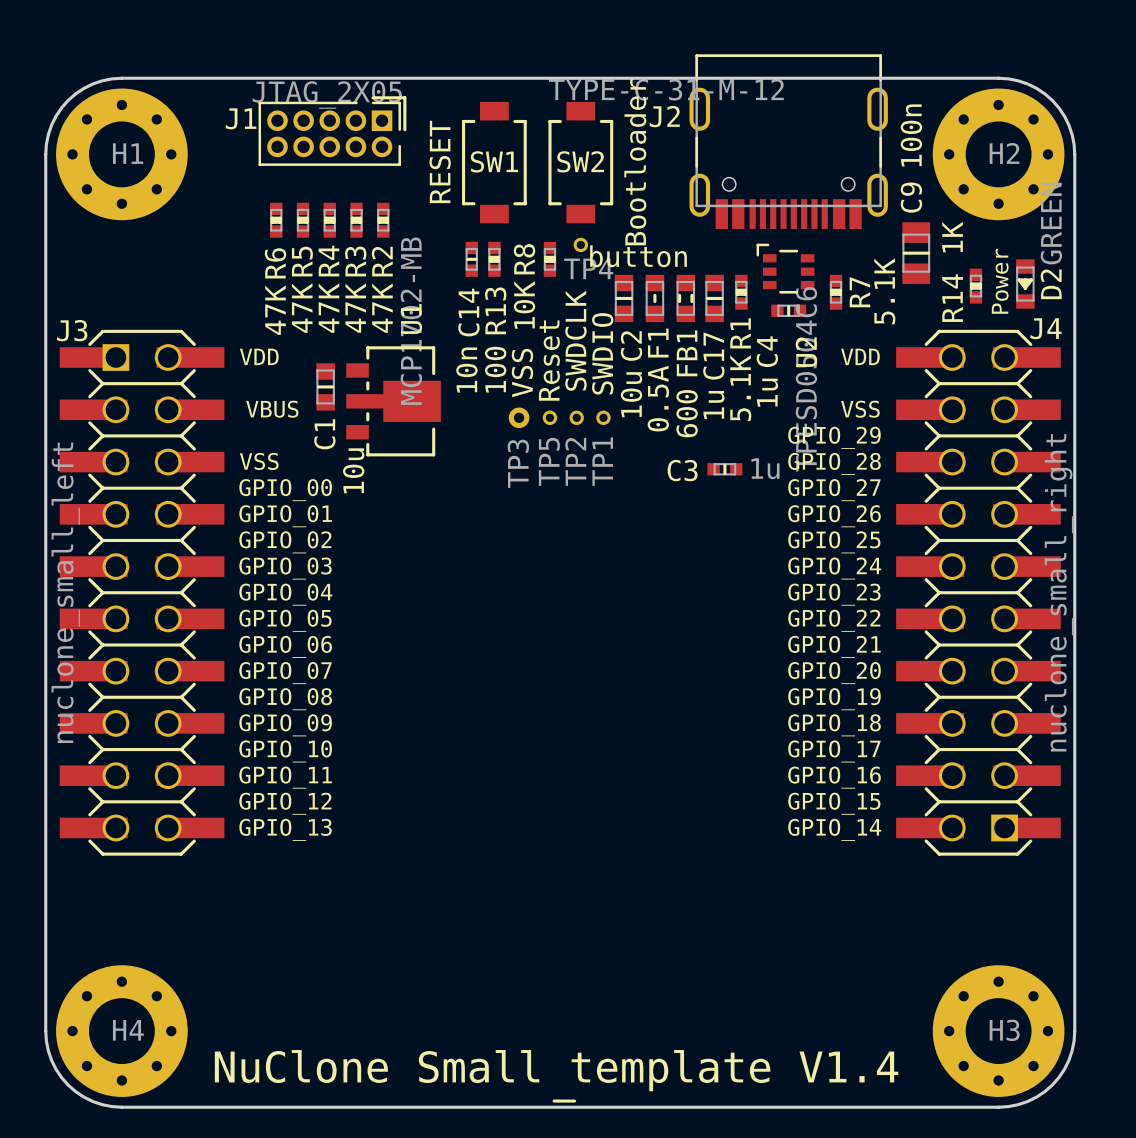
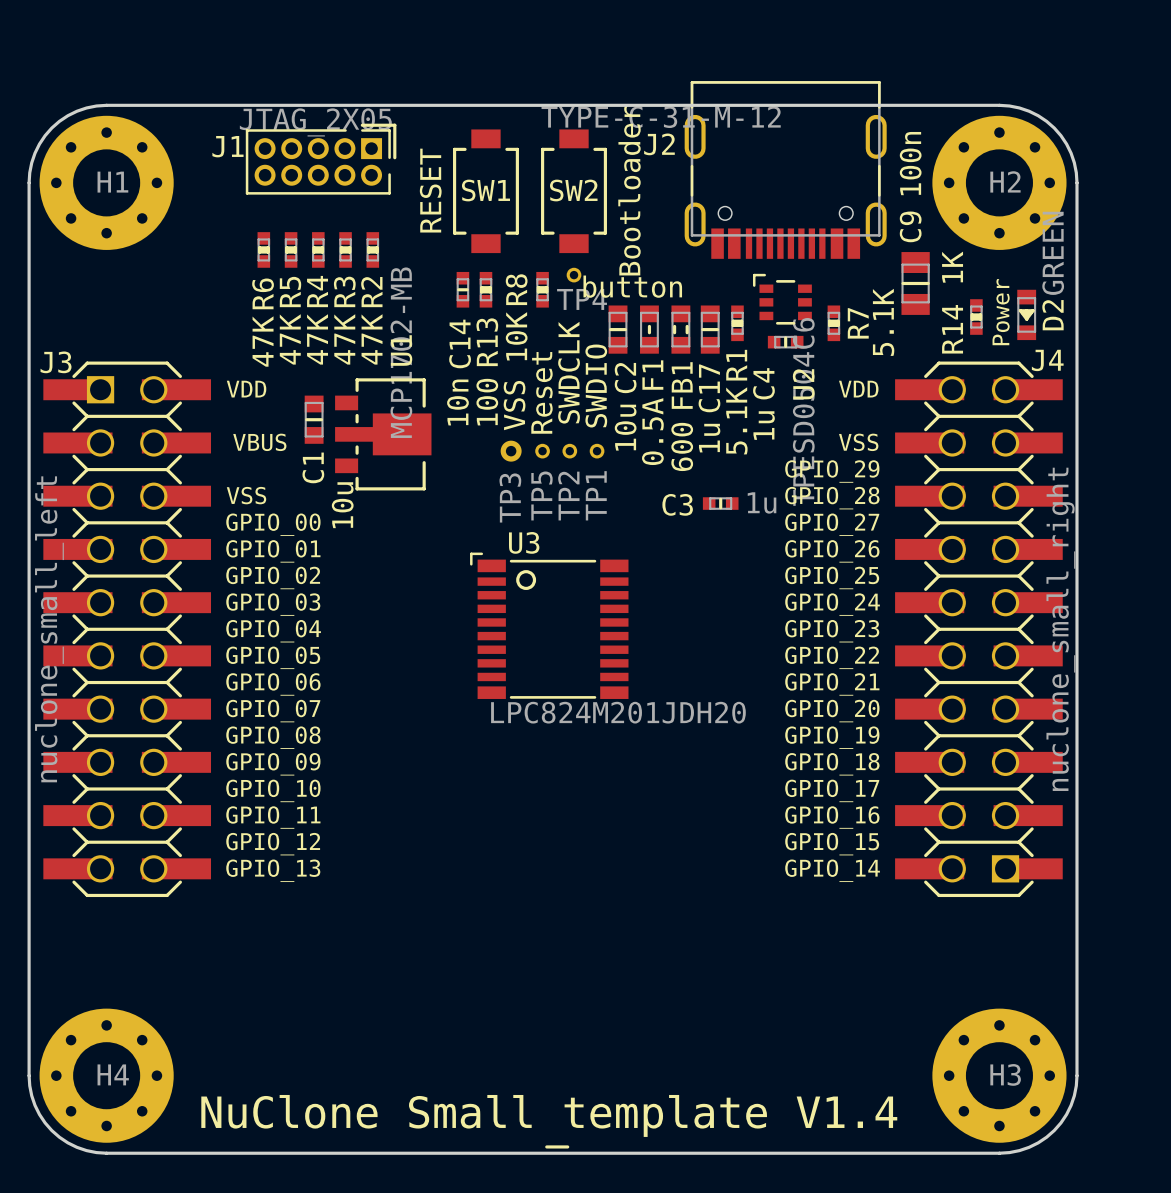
U3: none -> LPC824M201JDH20 (549, 625)

